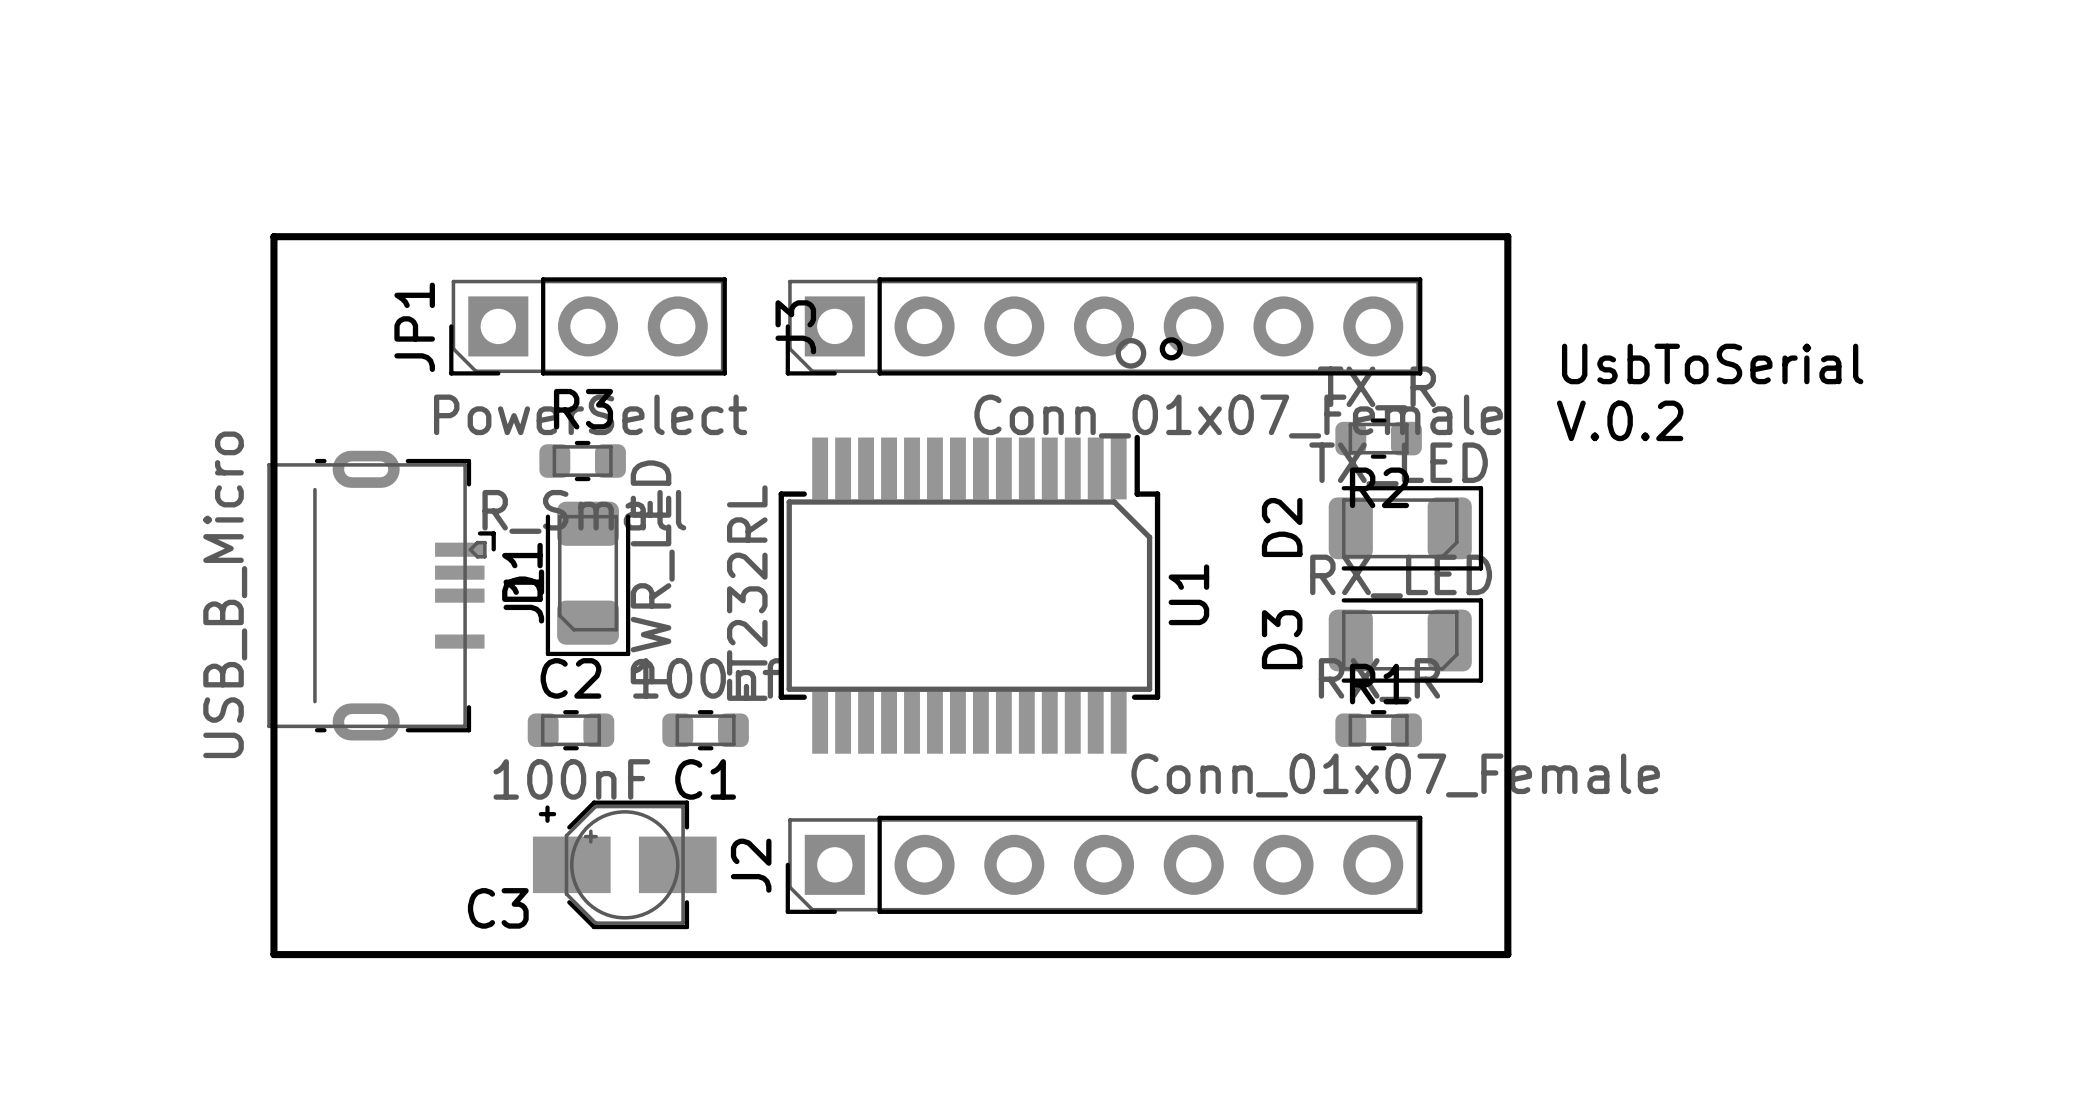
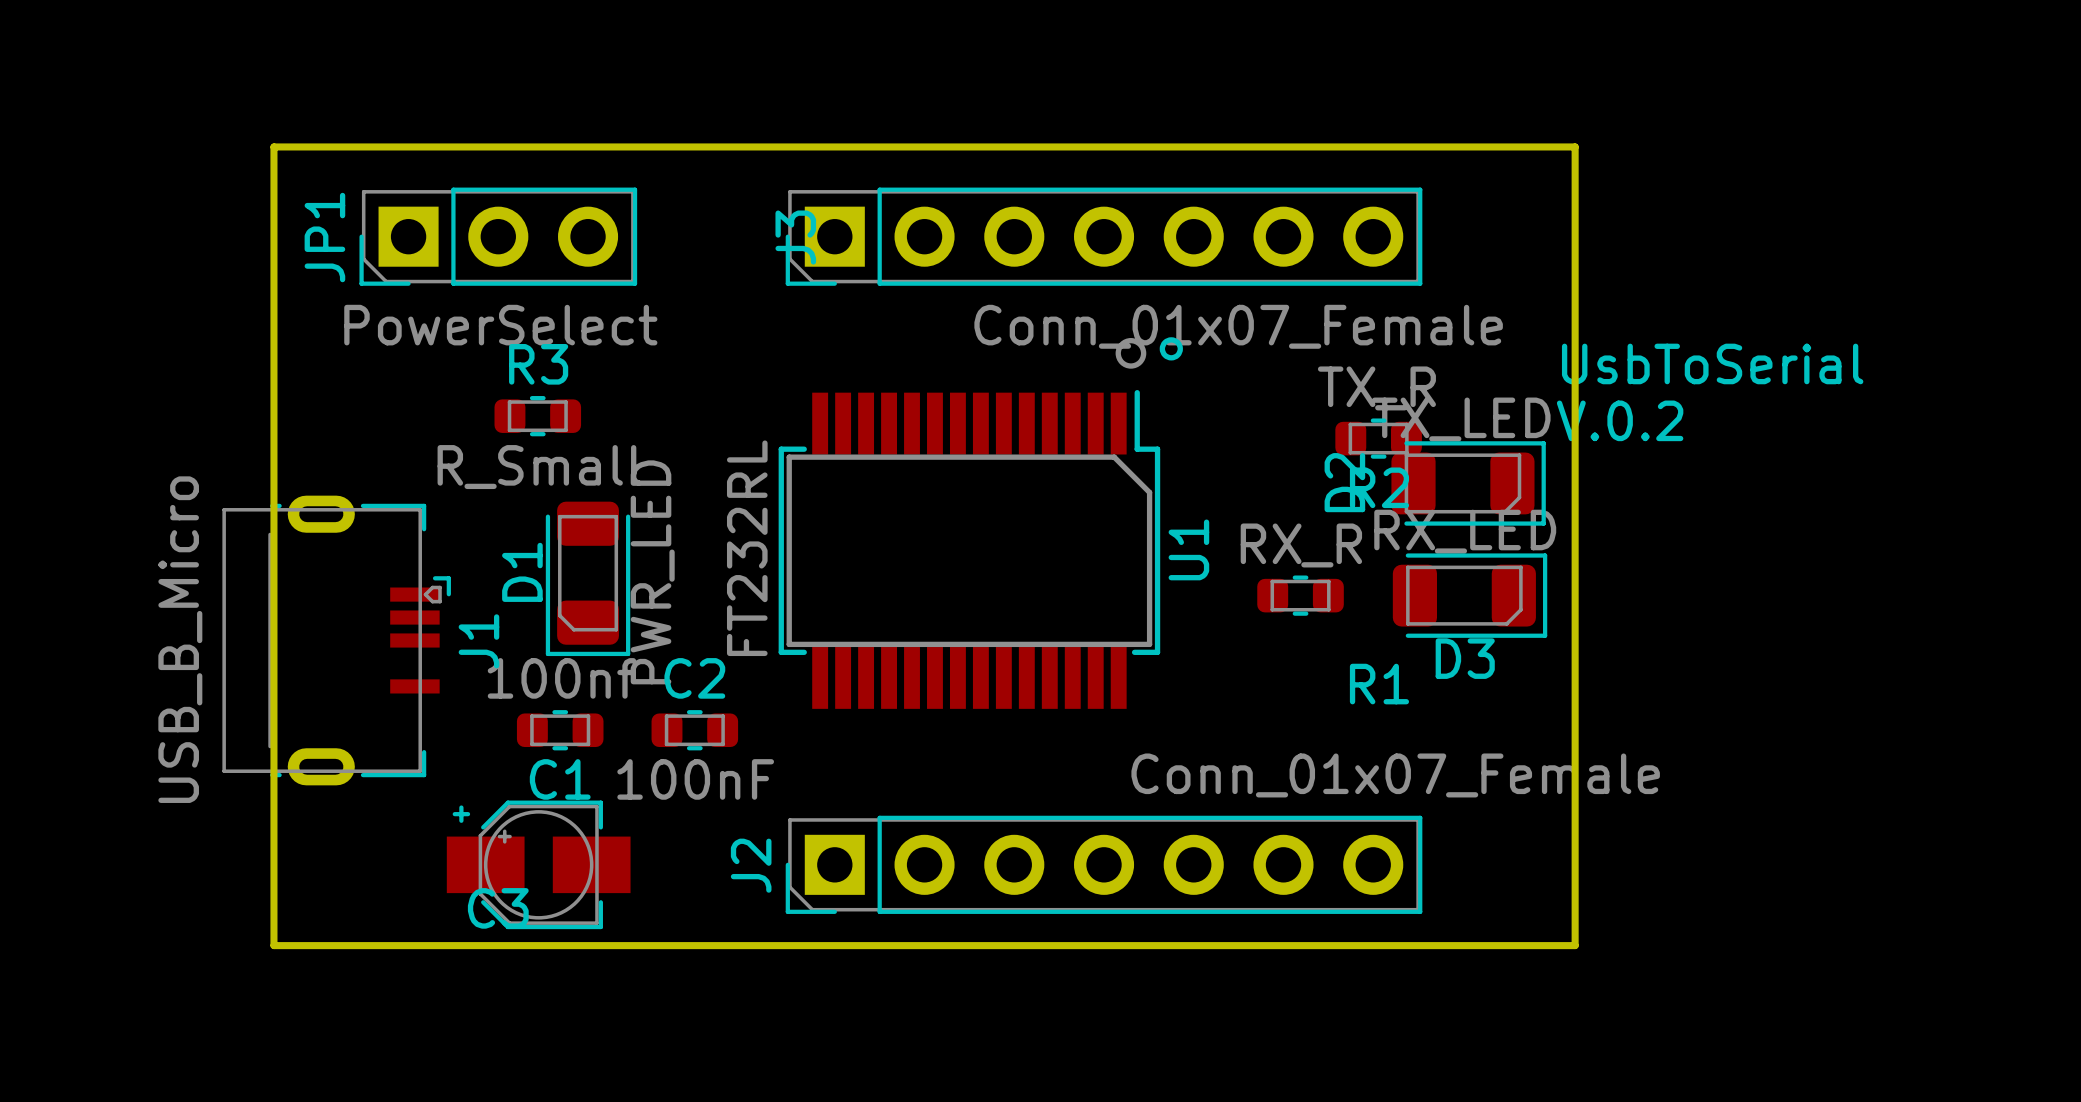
board edge: (273, 236) (1507, 236) (1507, 954) (273, 954) (273, 945) -> (273, 236) (273, 146) (1575, 146) (1575, 945) (273, 945)
JP1 position: (588, 326) -> (498, 236)
J3 position: (1104, 326) -> (1104, 236)
R3 position: (582, 461) -> (537, 416)
D2 position: (1405, 528) -> (1468, 483)
U1 position: (969, 594) -> (969, 549)
J1 position: (381, 595) -> (336, 640)
D3 name rotation: 0° (1282, 639) -> 90° clockwise (1465, 658)
D3 name position: D3 (1282, 639) -> D3 (1465, 658)
D3 position: (1405, 640) -> (1470, 595)
C2 position: (570, 730) -> (694, 730)
C1 position: (705, 730) -> (560, 730)
R1 position: (1378, 730) -> (1300, 595)
C3 position: (624, 864) -> (538, 864)

